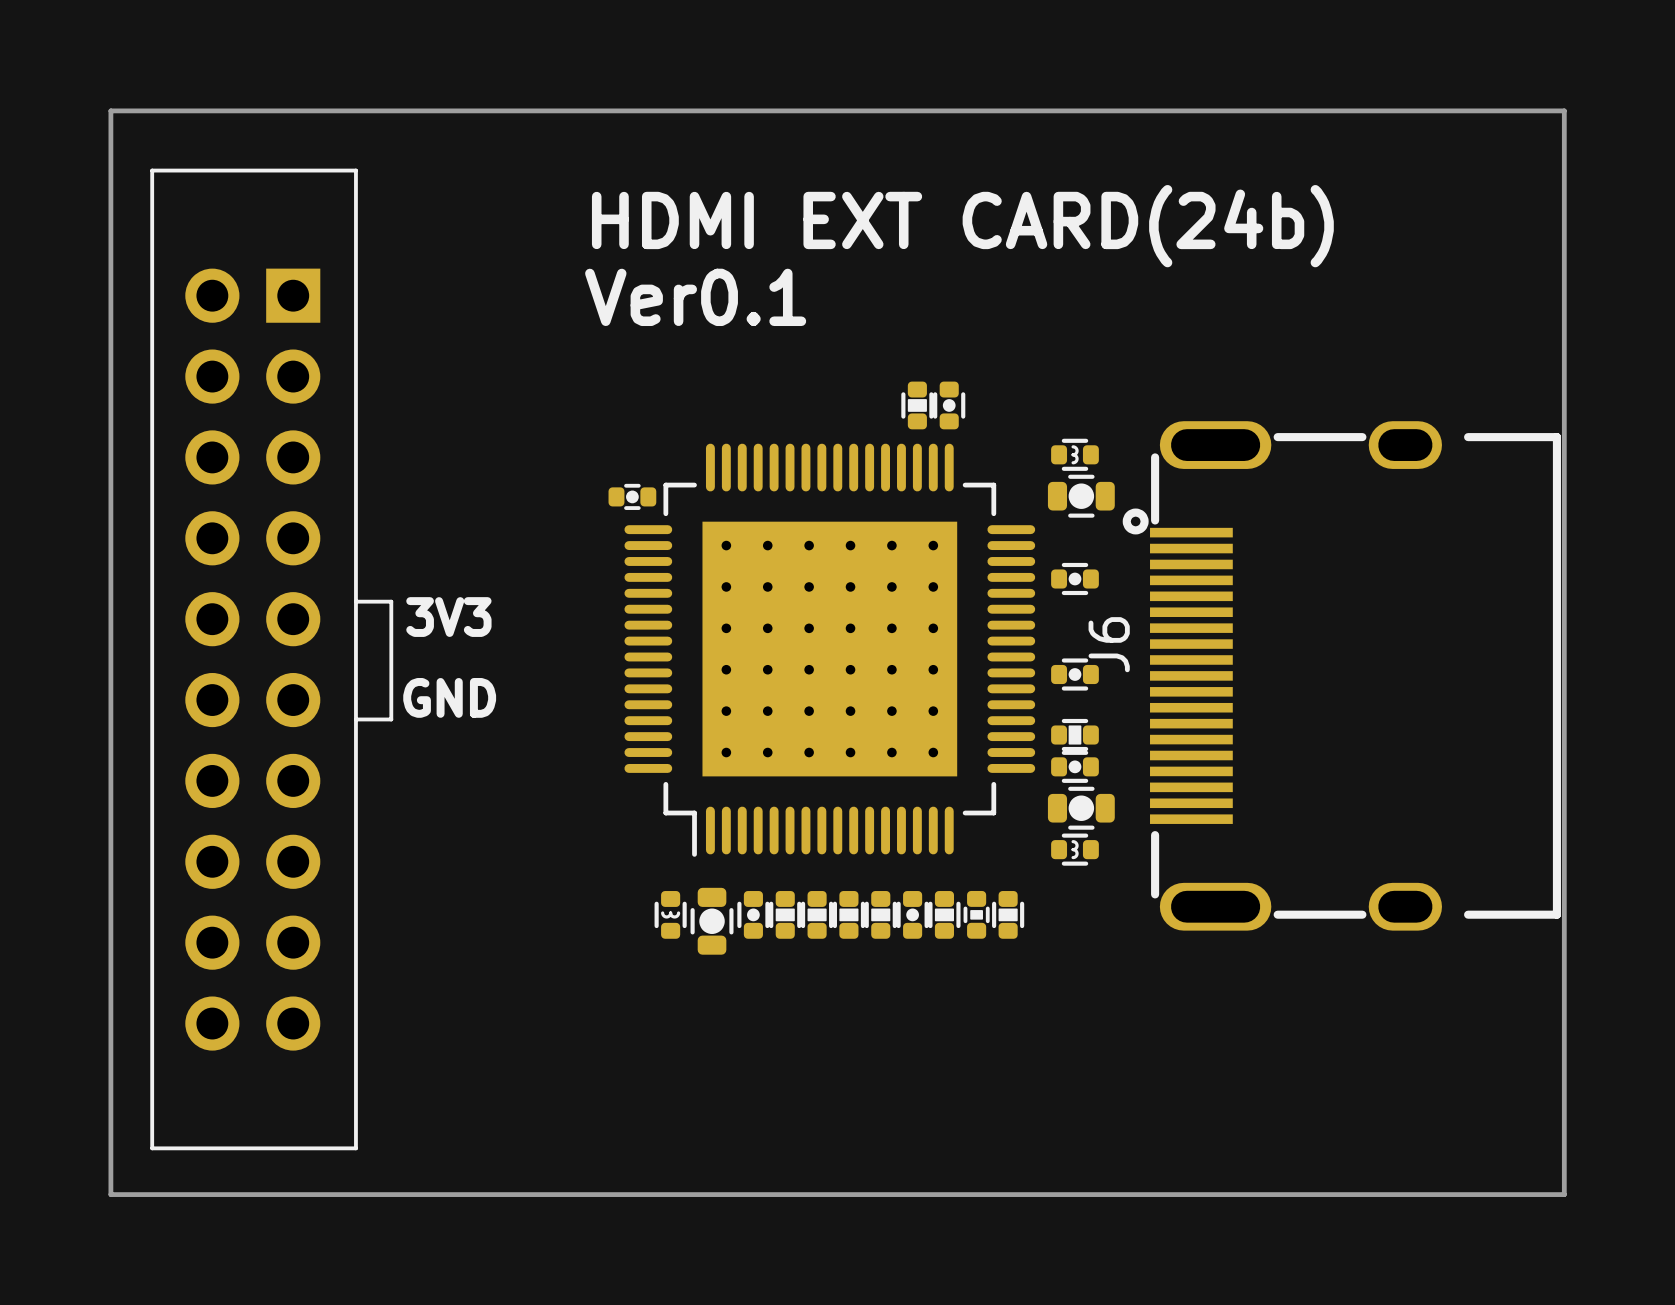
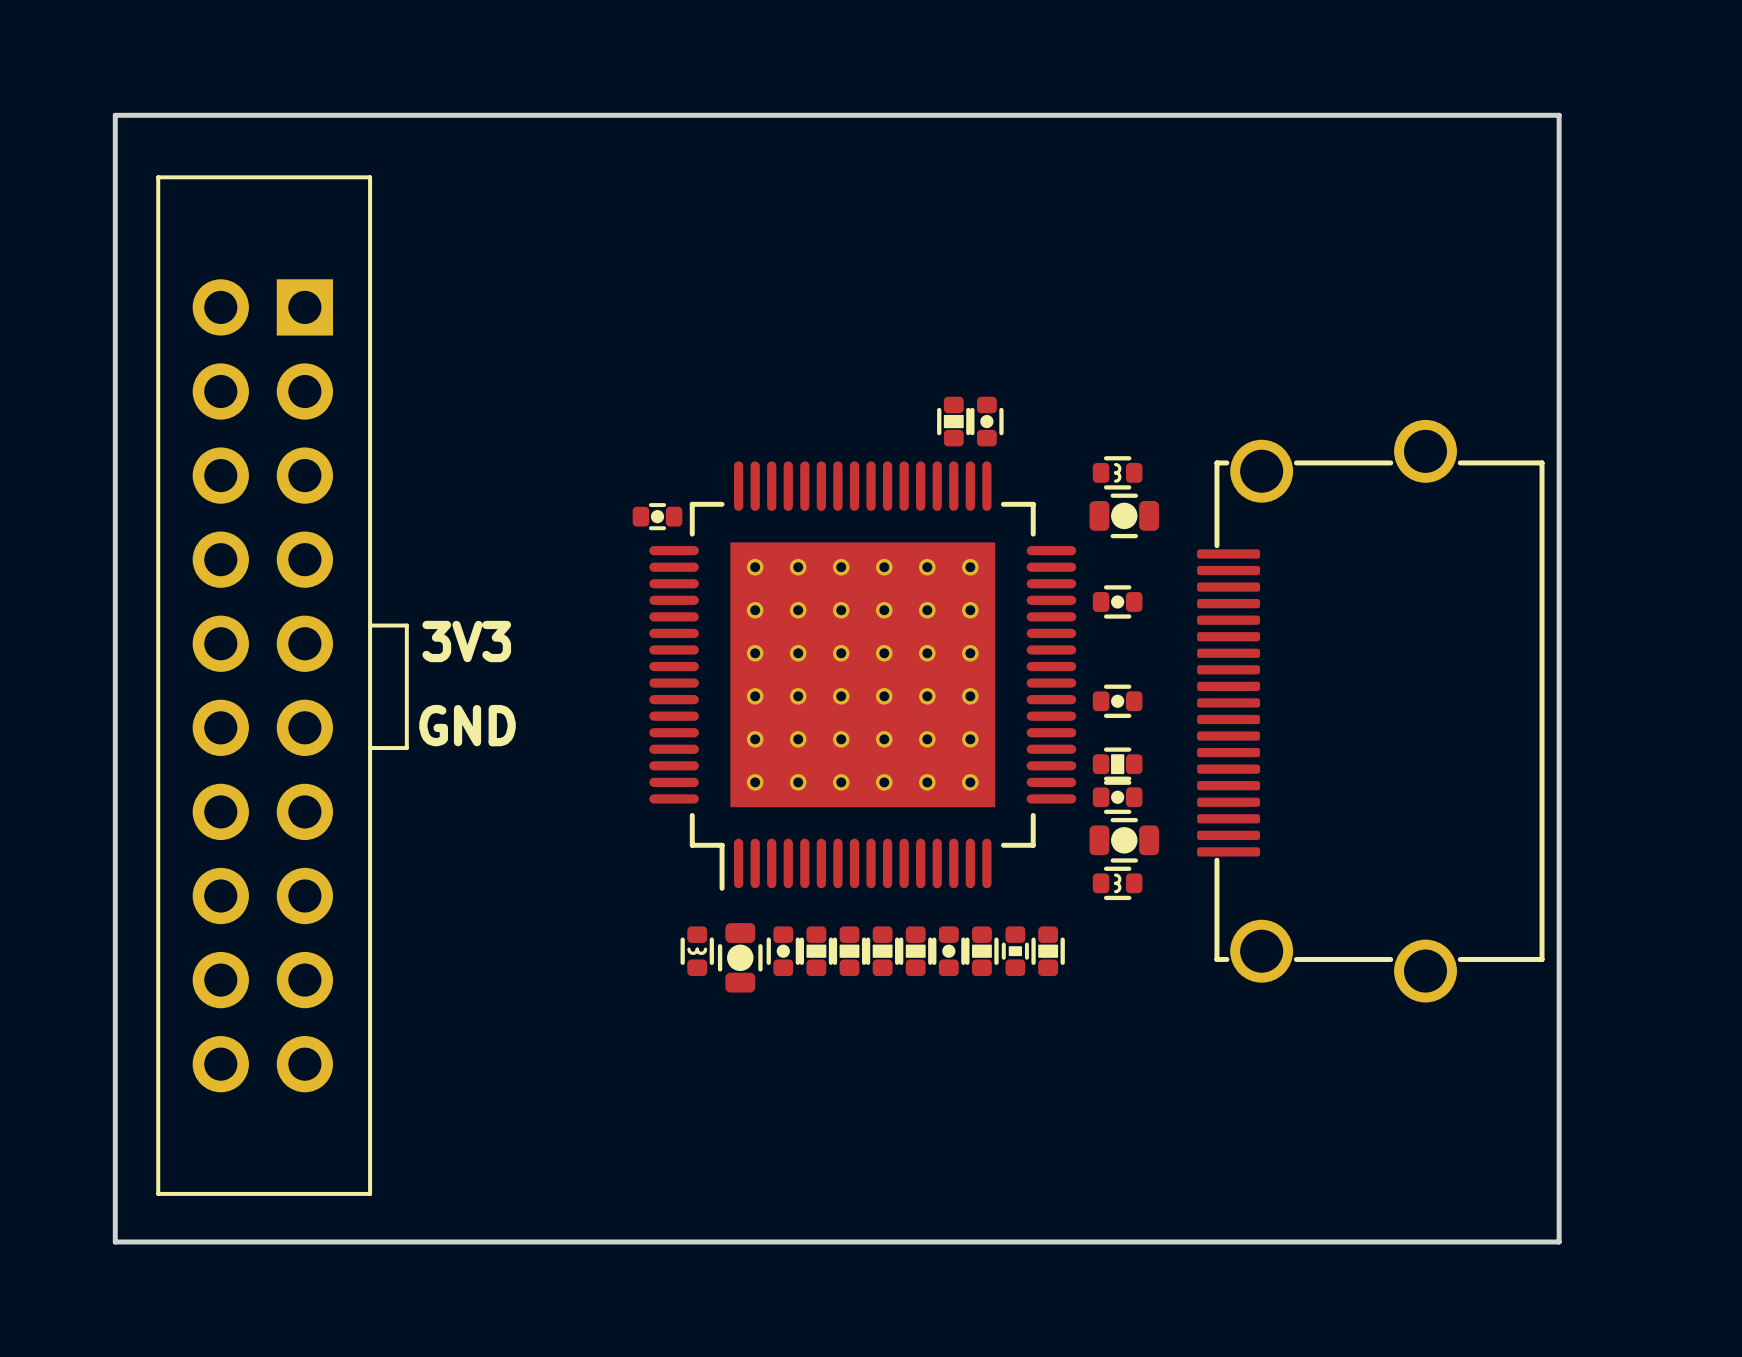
board edge: (1499, 110) (1564, 110) (1564, 1194) (1499, 1194) -> (1559, 115) (1559, 1241)
text: HDMI EXT CARD(24b) (962, 226) -> none
text: Ver0.1 (695, 297) -> none
J6: (1341, 675) -> none
part: none -> (1370, 711)

